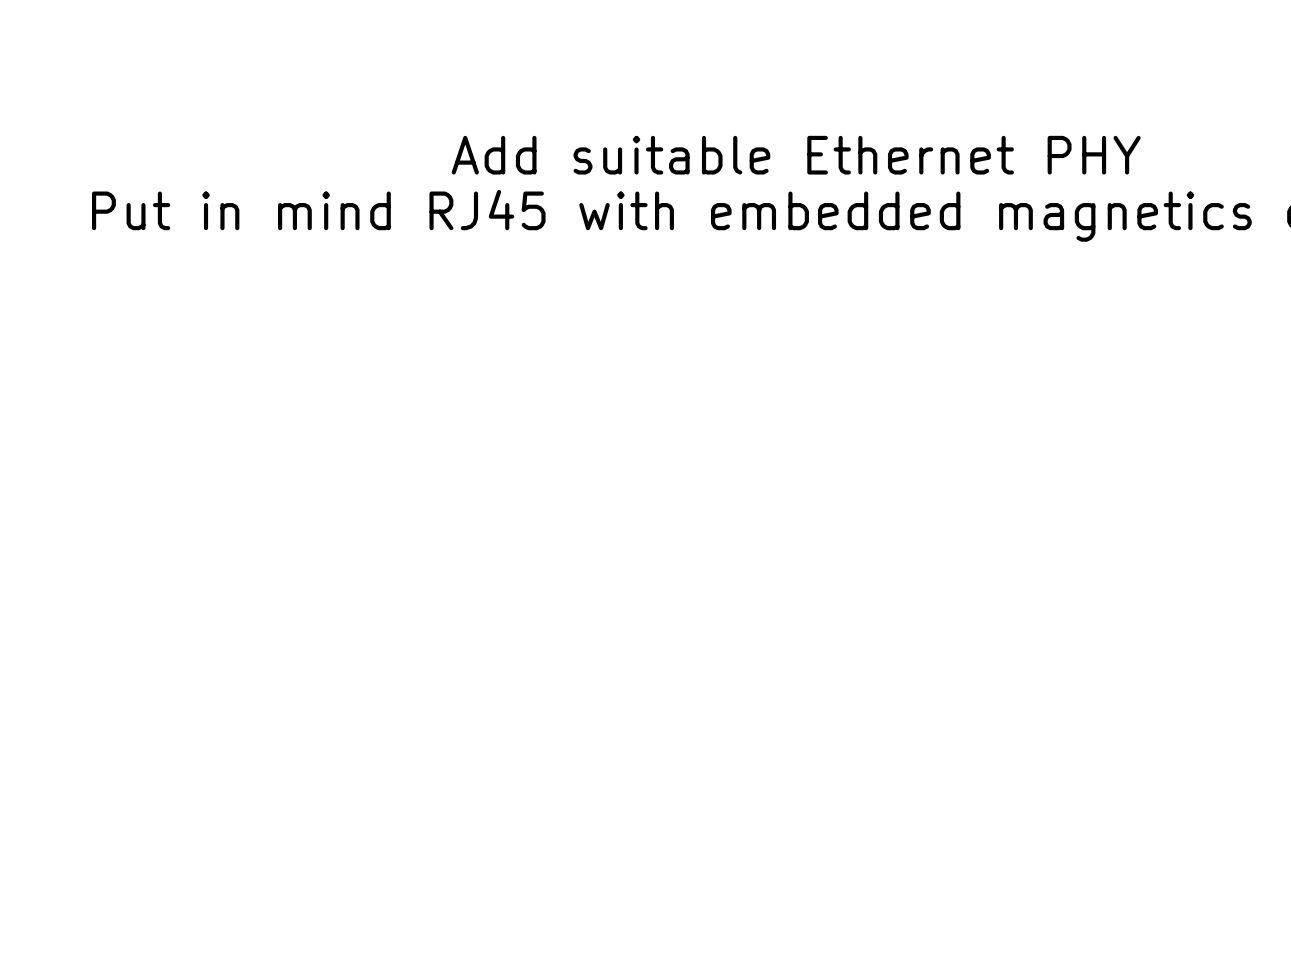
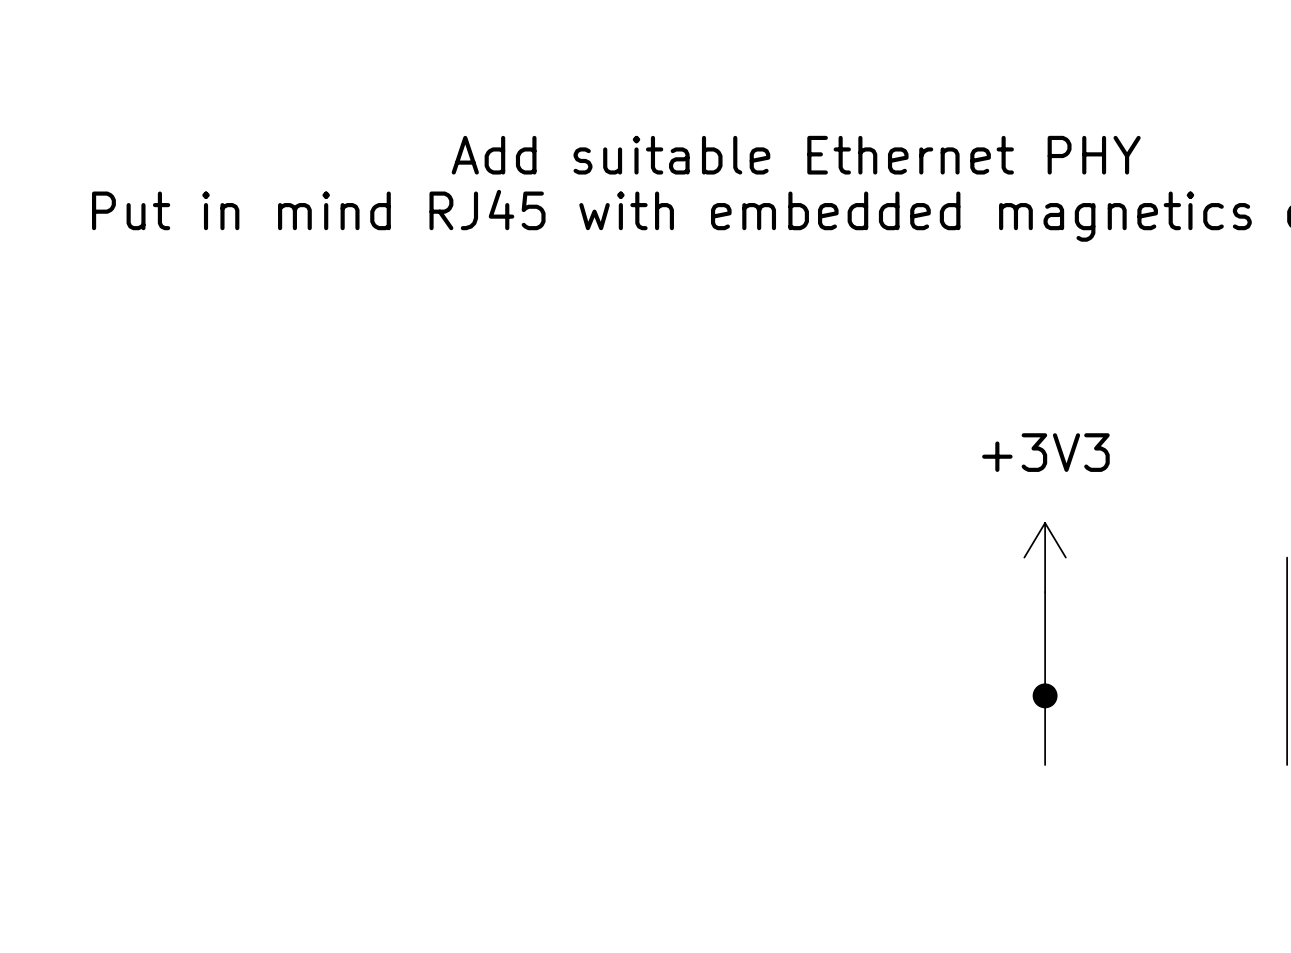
power symbol: none -> +3V3 (1045, 557)
wire: none -> (1287, 557) (1287, 765)
wire: none -> (1045, 592) (1045, 765)
junction: none -> (1045, 695)

